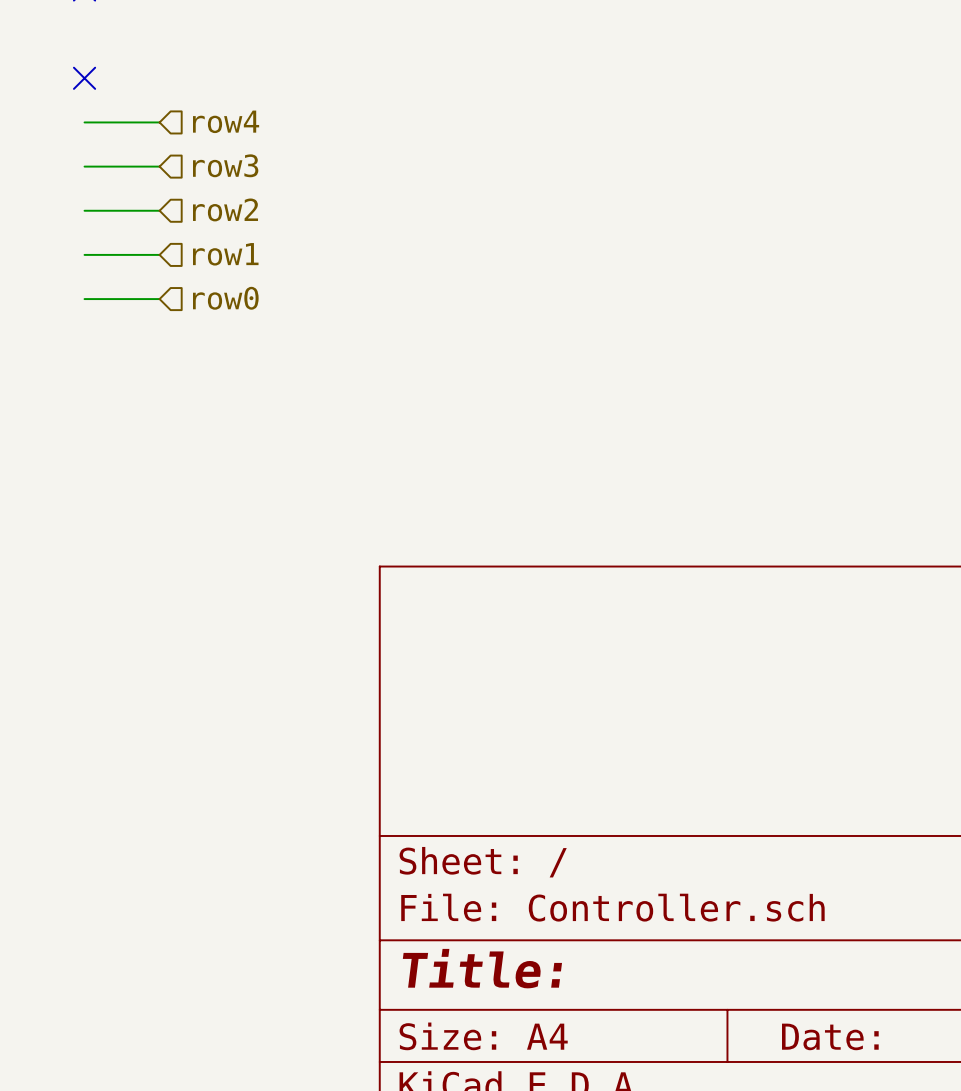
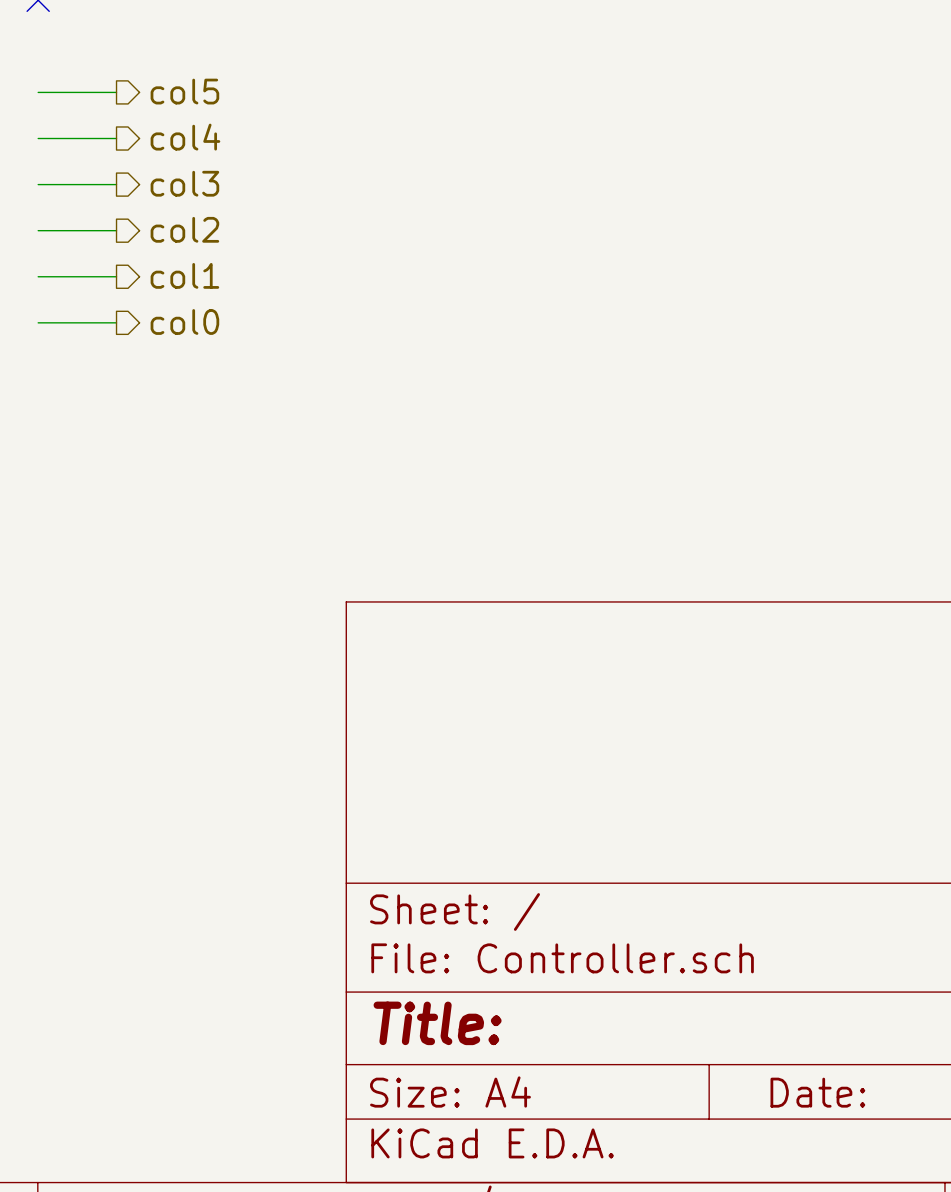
hierarchical label: none -> col5 (184, 91)
wire: none -> (38, 92) (116, 92)
no-connect mark: (84, 78) -> none
hierarchical label shape: input (226, 121) -> output (185, 137)
hierarchical label: row4 (226, 121) -> col4 (185, 137)
hierarchical label shape: input (225, 165) -> output (184, 183)
hierarchical label: row3 (225, 165) -> col3 (184, 183)
hierarchical label shape: input (225, 209) -> output (184, 229)
hierarchical label: row2 (225, 209) -> col2 (184, 229)
hierarchical label shape: input (225, 254) -> output (184, 275)
hierarchical label: row1 (225, 254) -> col1 (184, 275)
hierarchical label shape: input (225, 298) -> output (184, 321)
hierarchical label: row0 (225, 298) -> col0 (184, 321)

